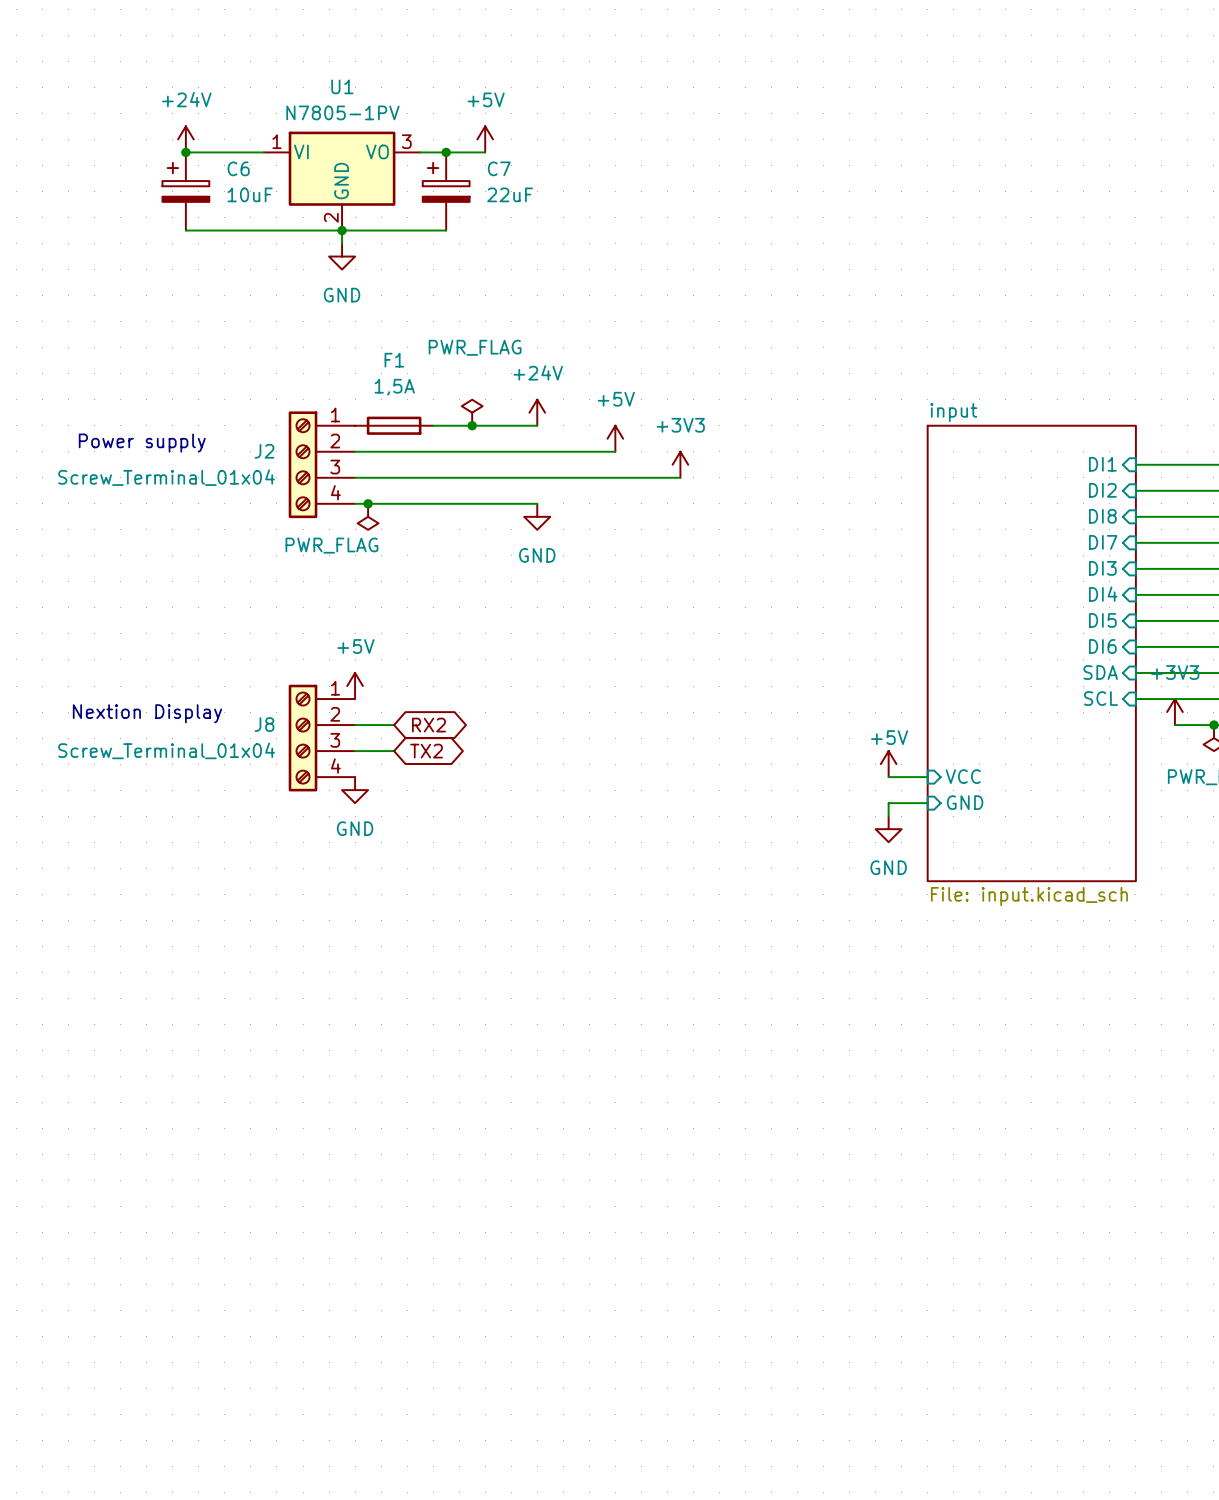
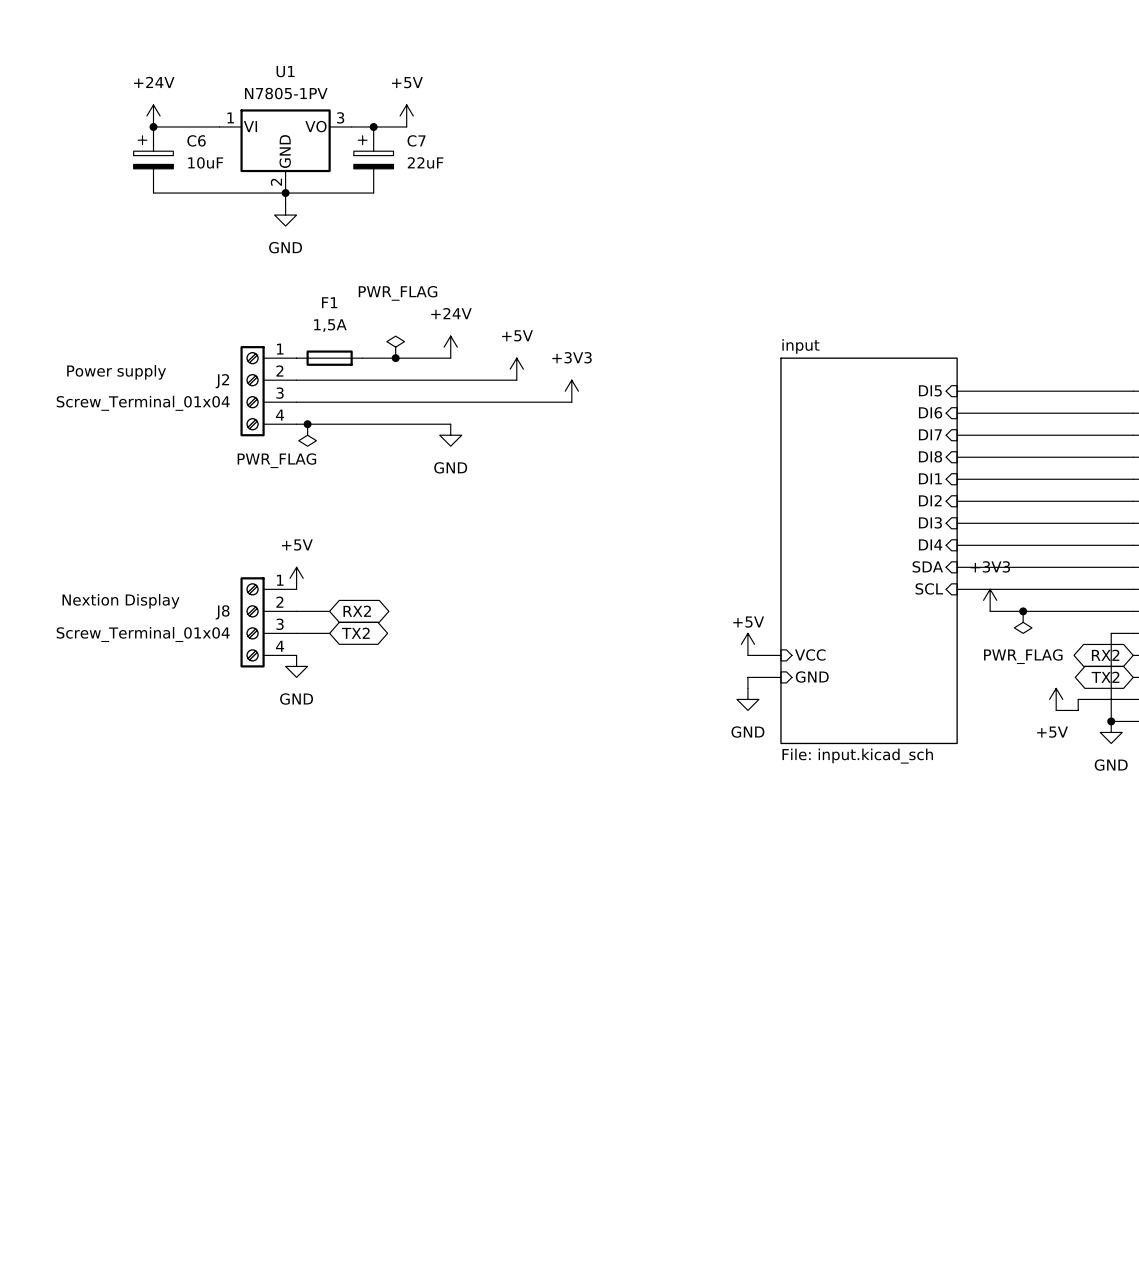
sheet pin: DI1 (1102, 464) -> DI5 (930, 390)
sheet pin: DI2 (1102, 490) -> DI6 (930, 412)
sheet pin: DI8 (1102, 516) -> DI7 (930, 434)
sheet pin: DI7 (1103, 542) -> DI8 (930, 456)
sheet pin: DI3 (1102, 568) -> DI1 (930, 478)
sheet pin: DI4 (1103, 594) -> DI2 (930, 500)
sheet pin: DI5 (1102, 620) -> DI3 (930, 522)
sheet pin: DI6 (1102, 646) -> DI4 (930, 544)

